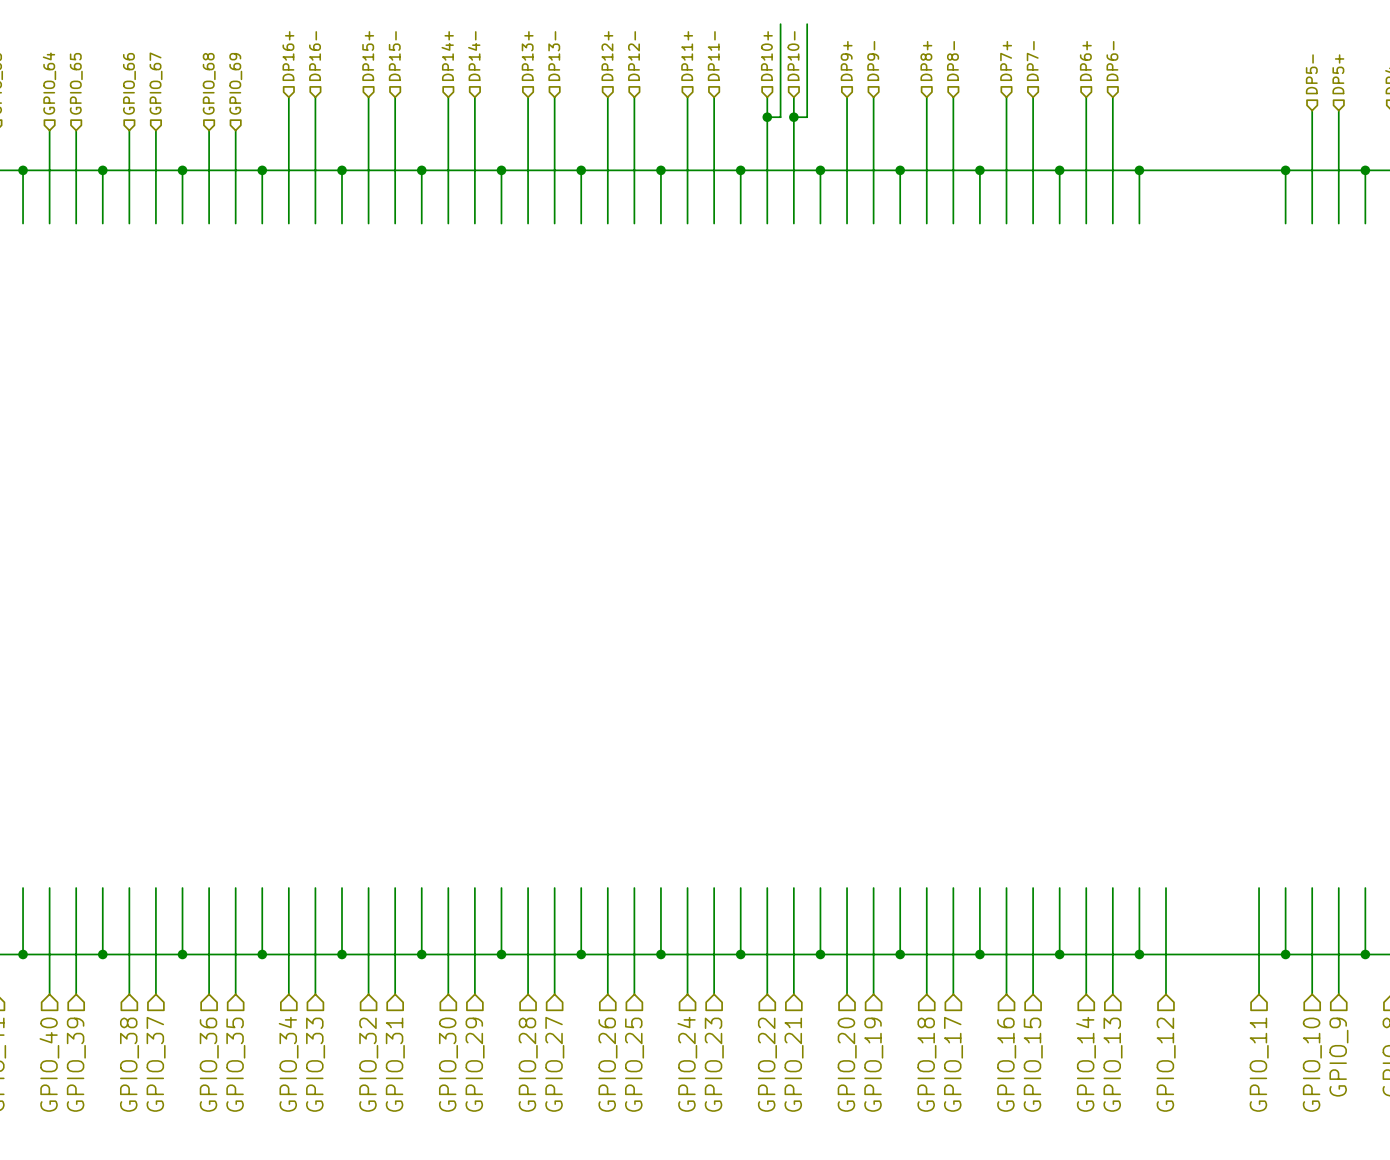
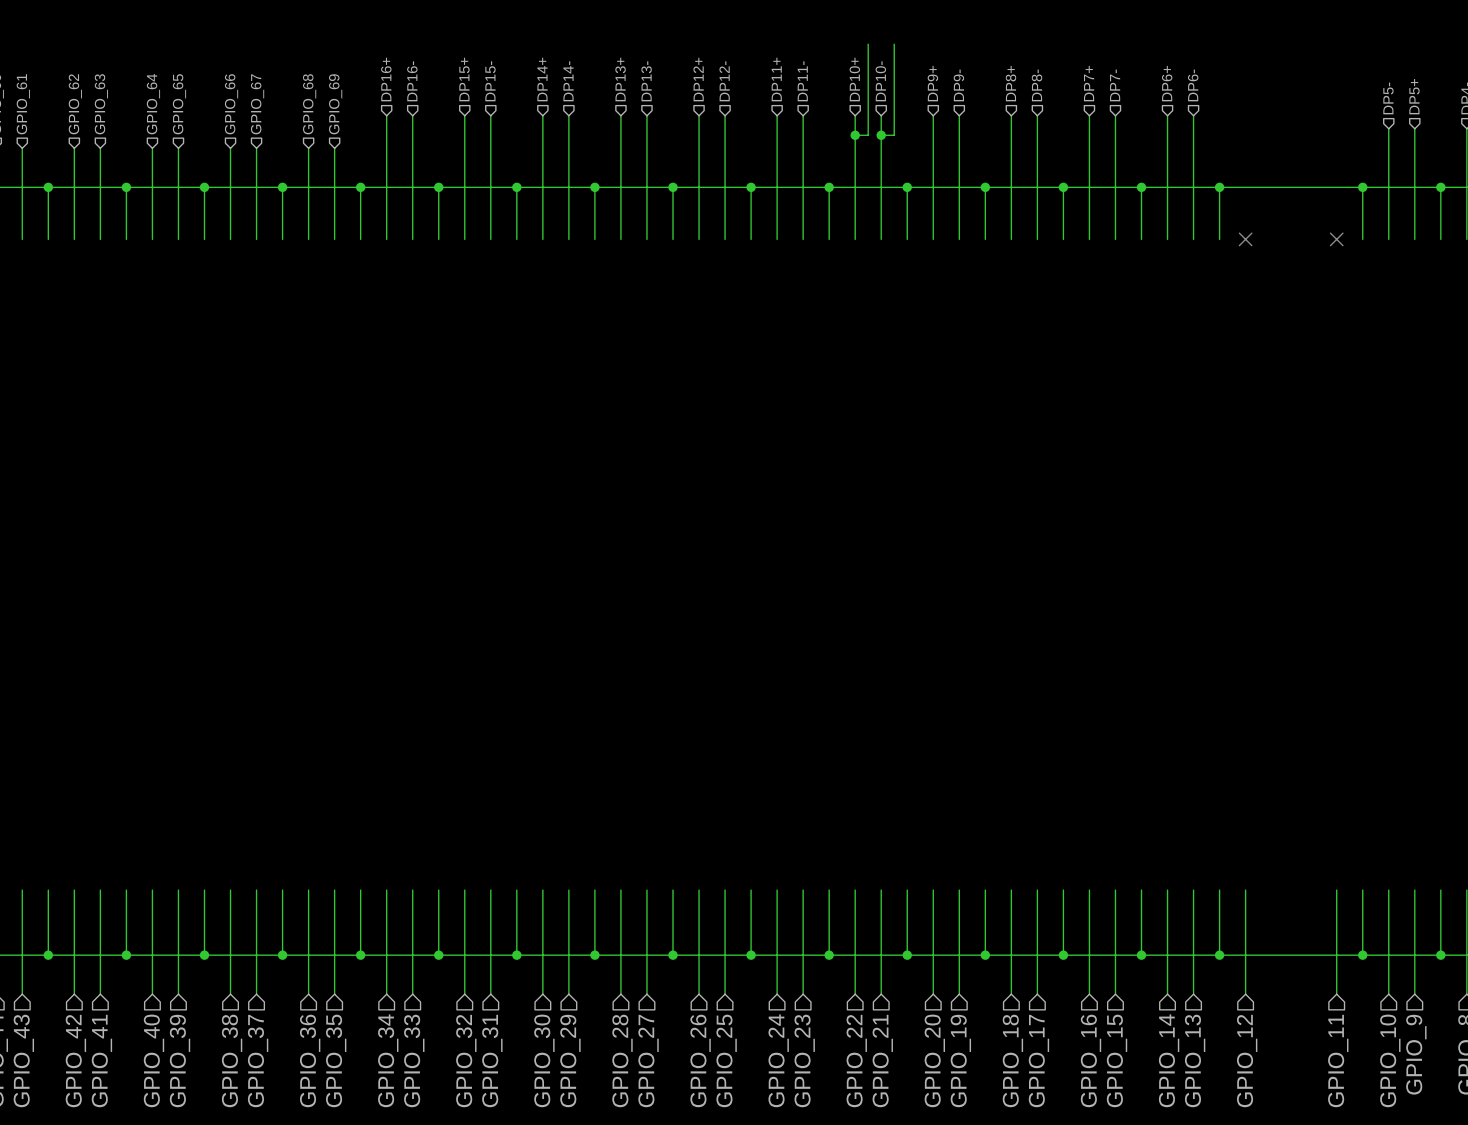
no-connect mark: none -> (1245, 239)
no-connect mark: none -> (1336, 239)

